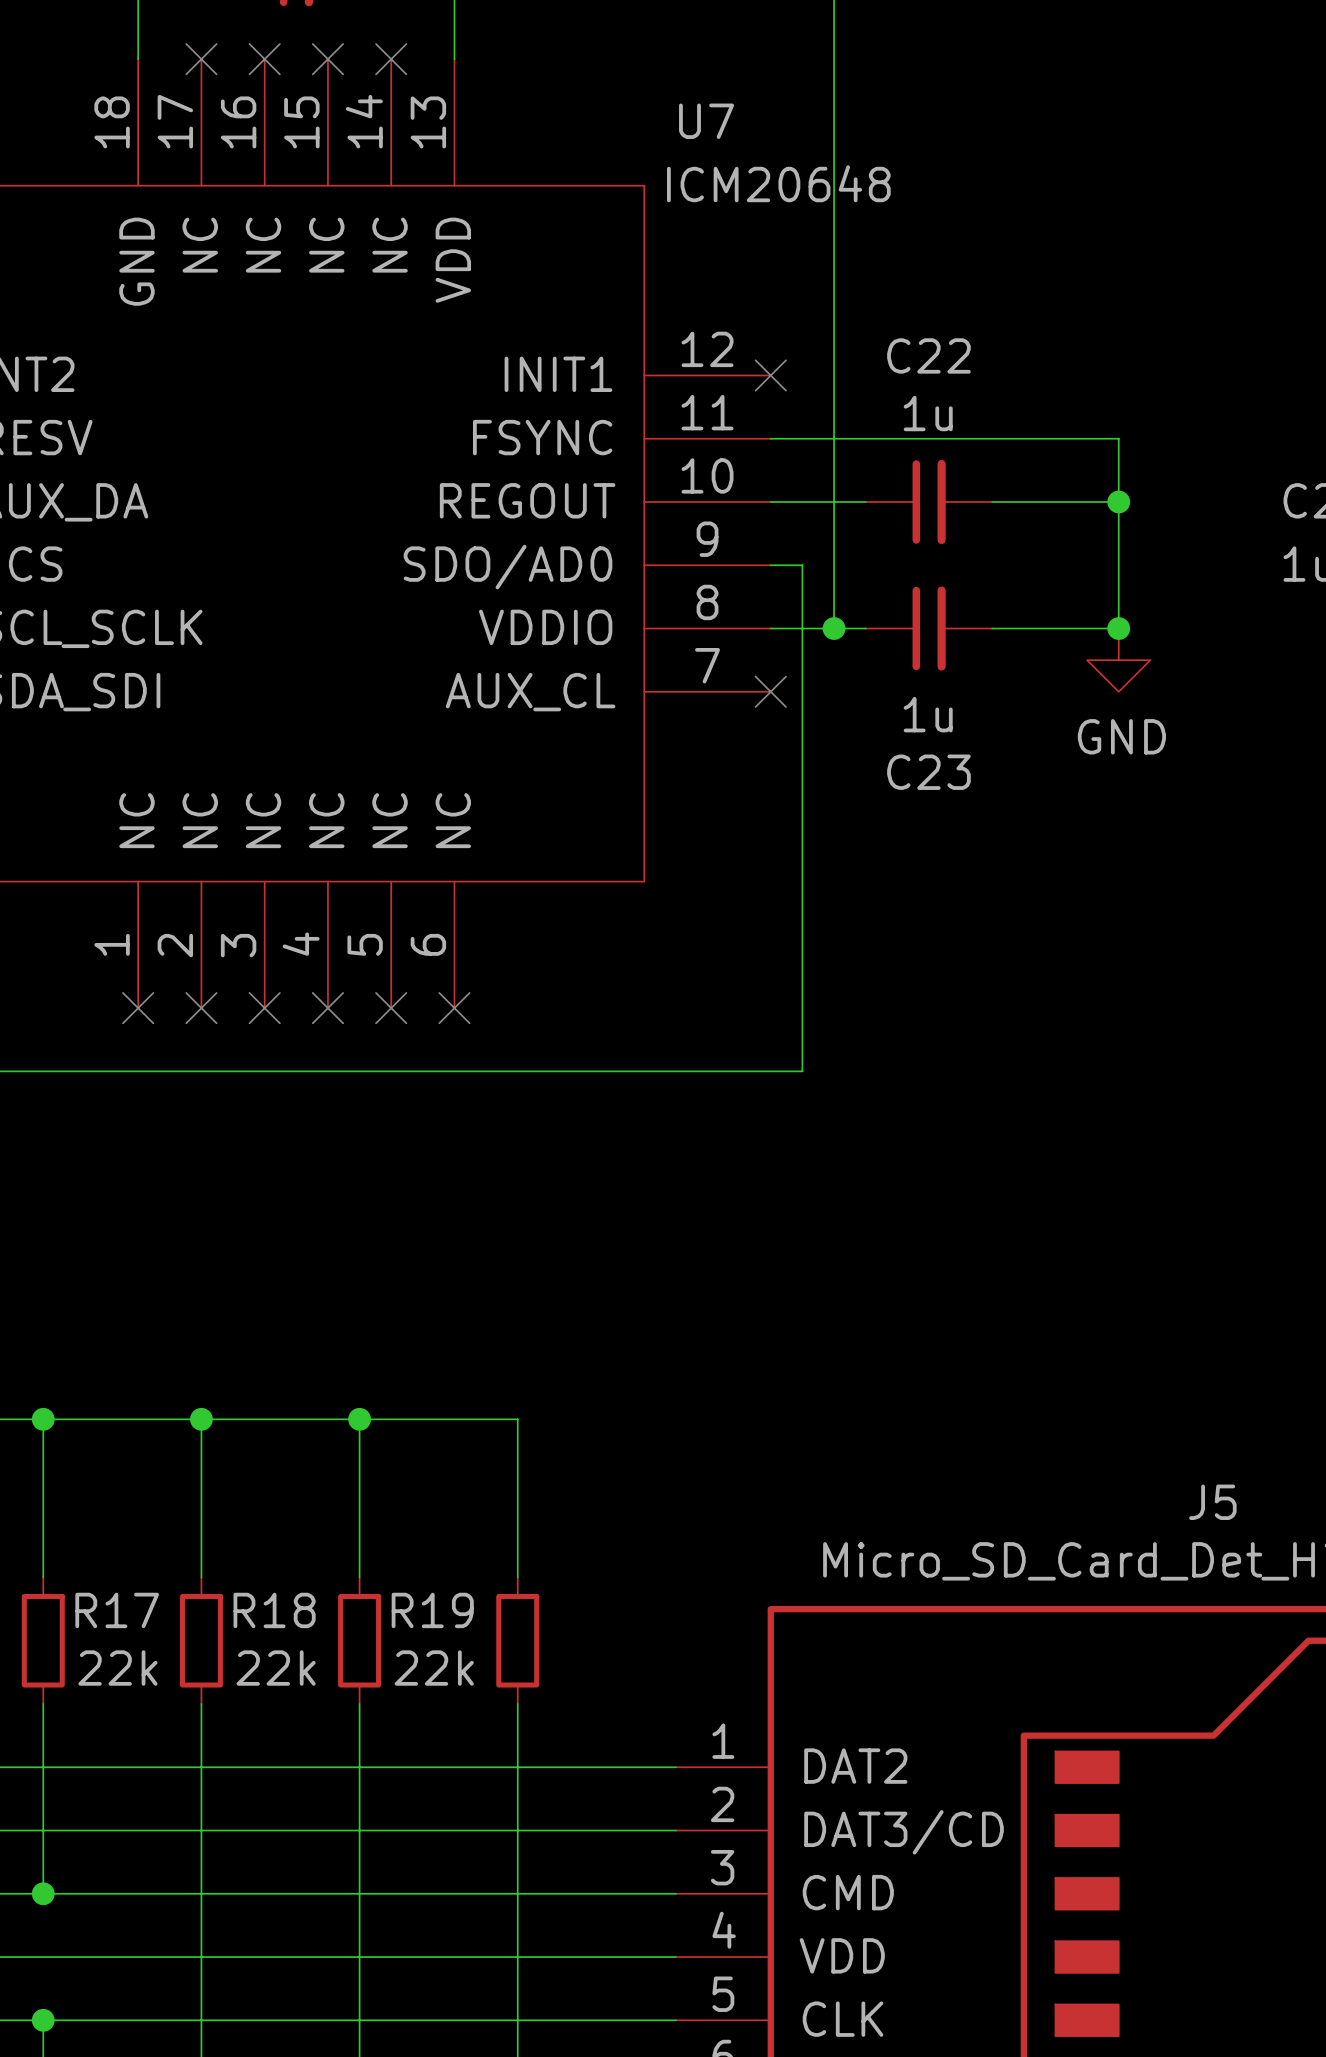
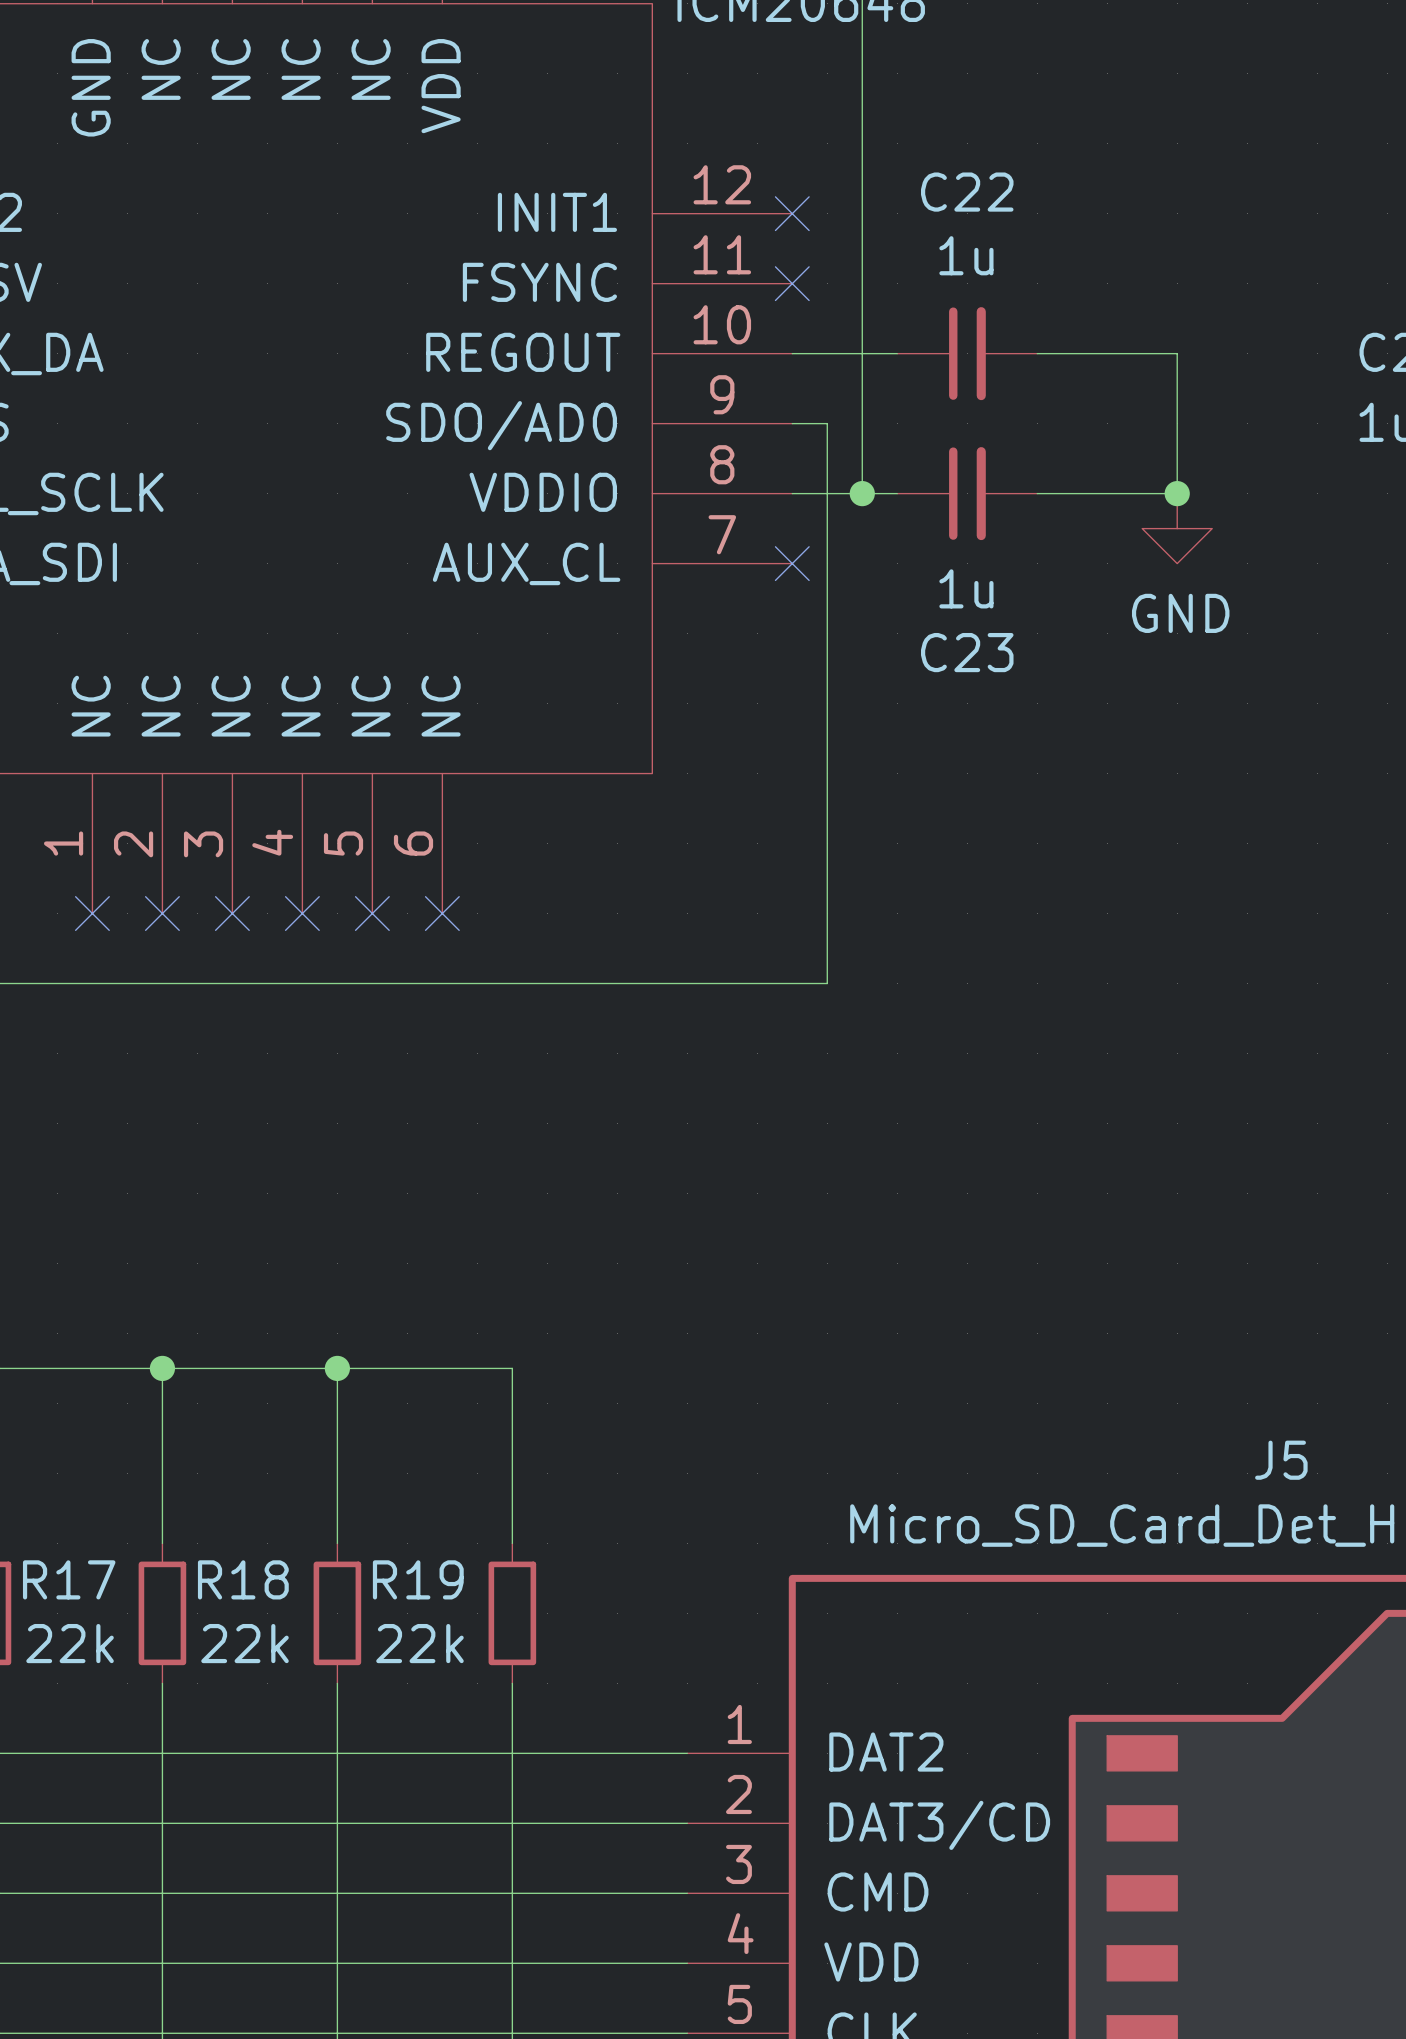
wire: (770, 438) (1118, 438) (1118, 502) -> none
no-connect mark: none -> (792, 283)
junction: (1118, 502) -> none

